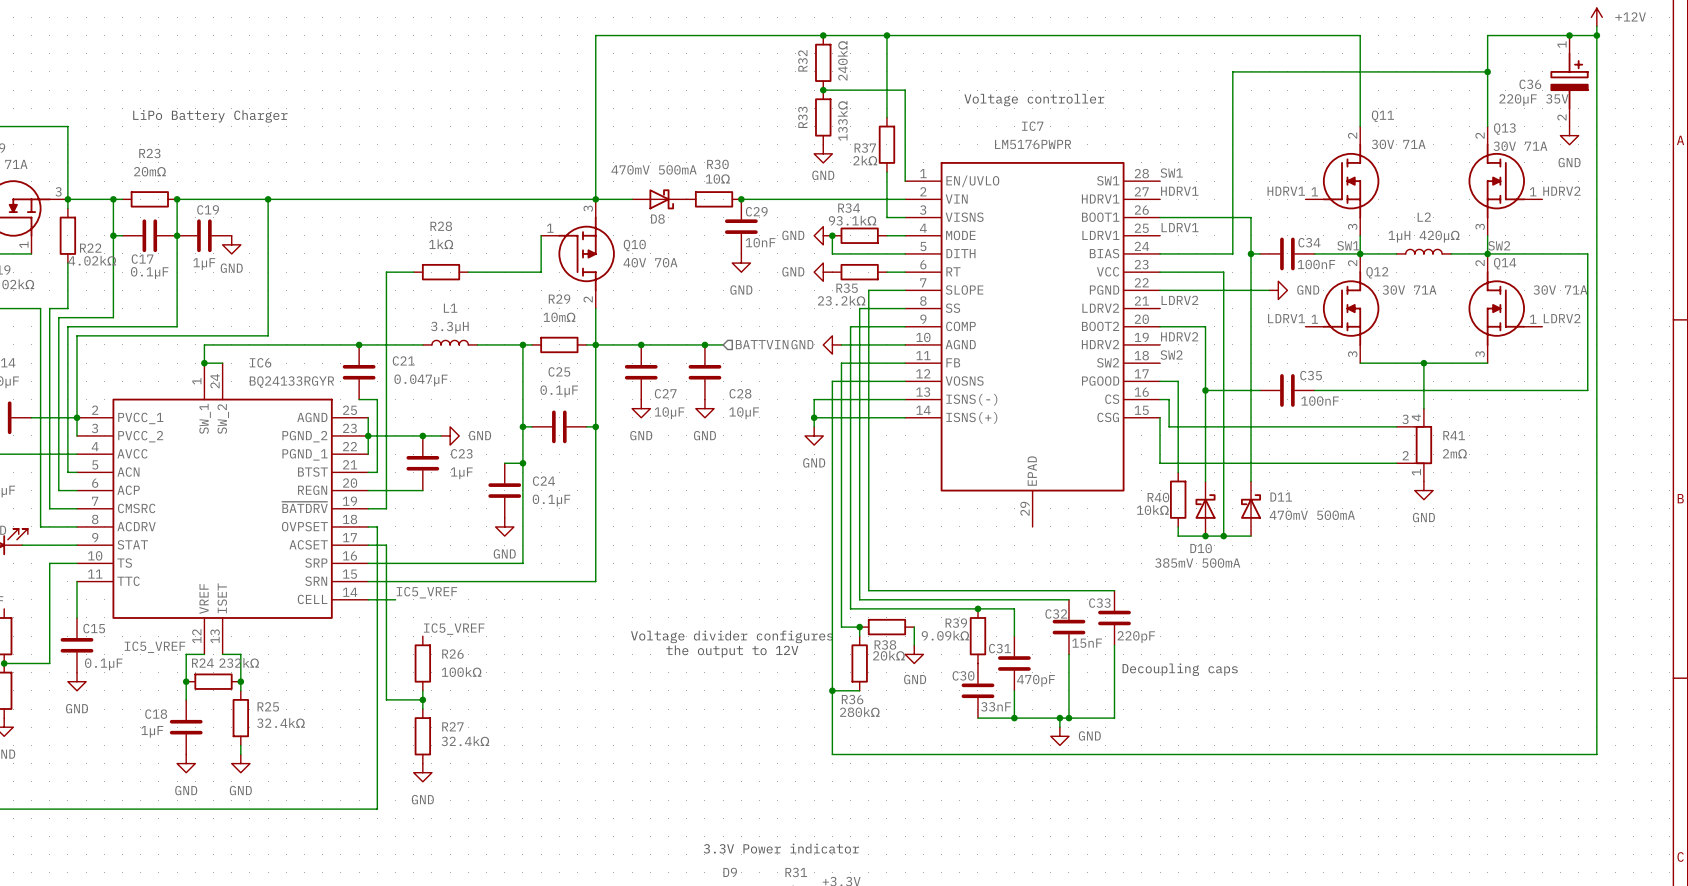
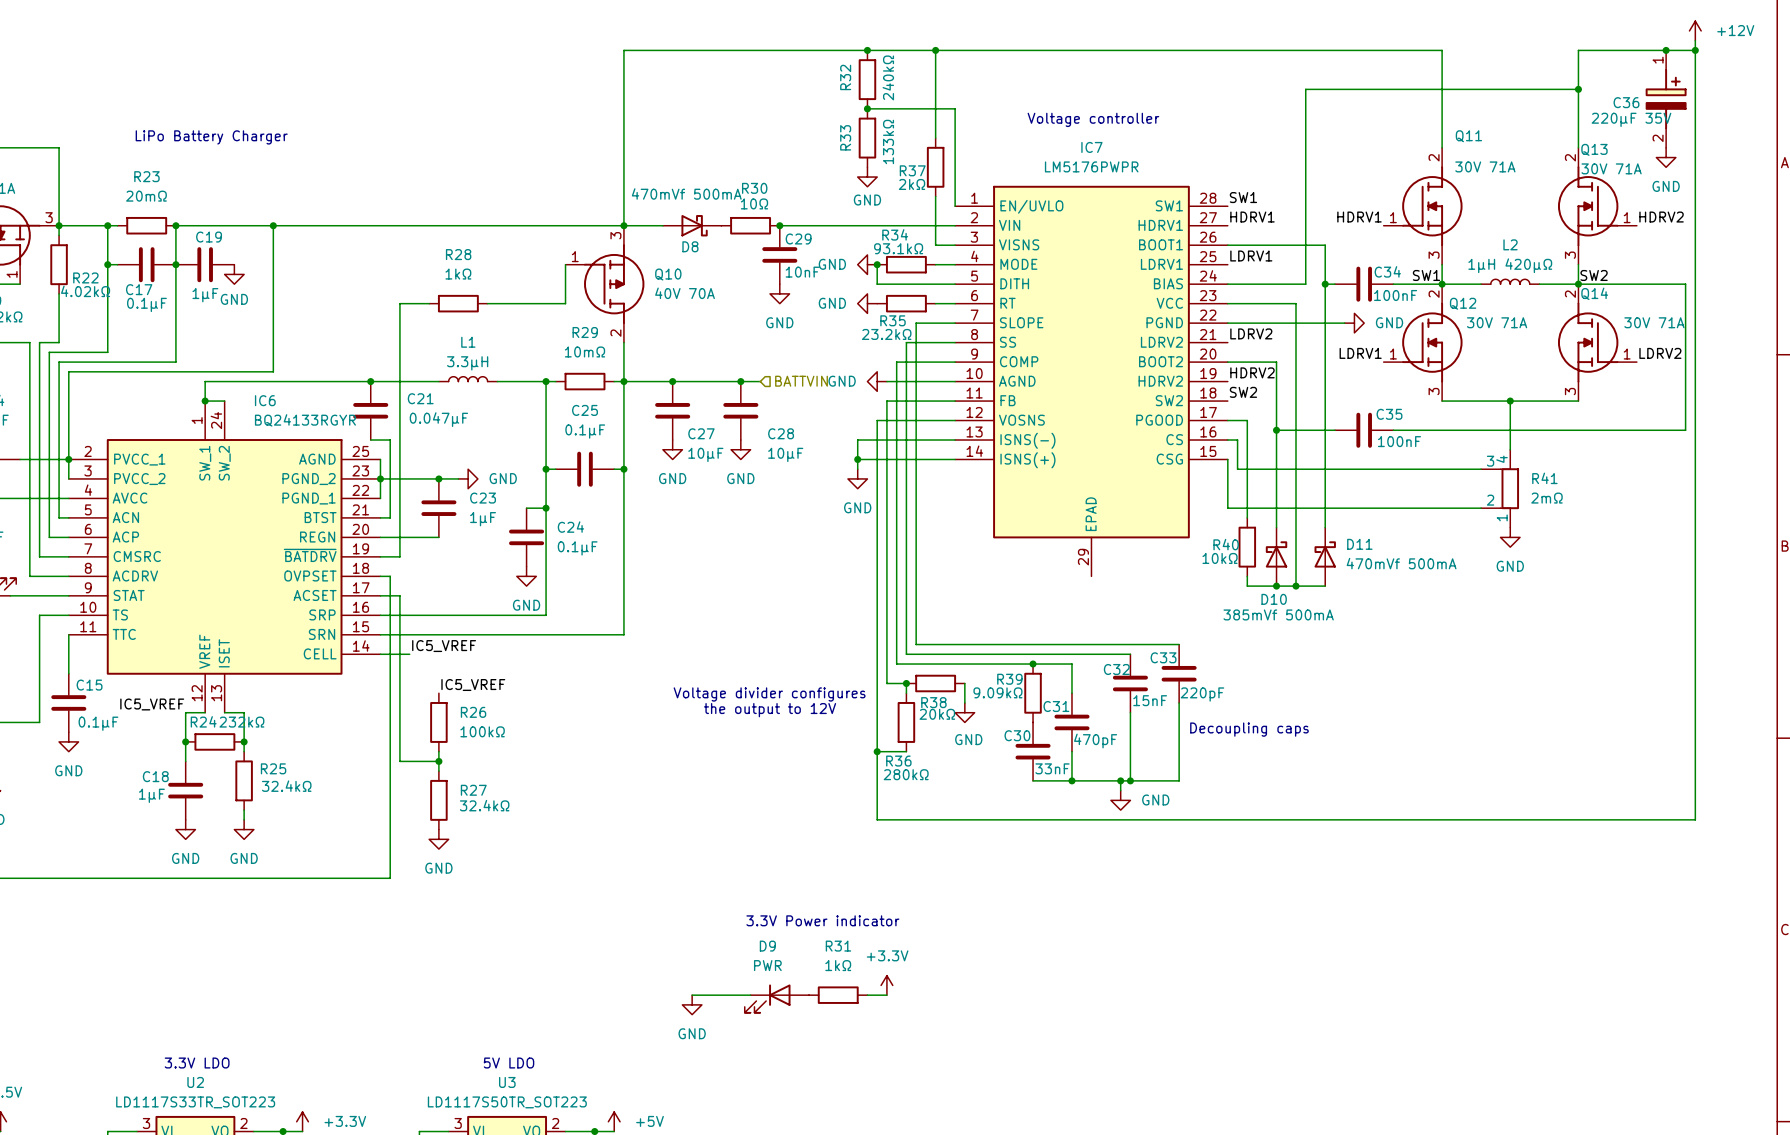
D8 value: 470mV 500mA (654, 169) -> 470mVf 500mA (686, 193)
D11 value: 470mV 500mA (1312, 515) -> 470mVf 500mA (1401, 563)
D10 value: 385mV 500mA (1197, 563) -> 385mVf 500mA (1278, 614)

